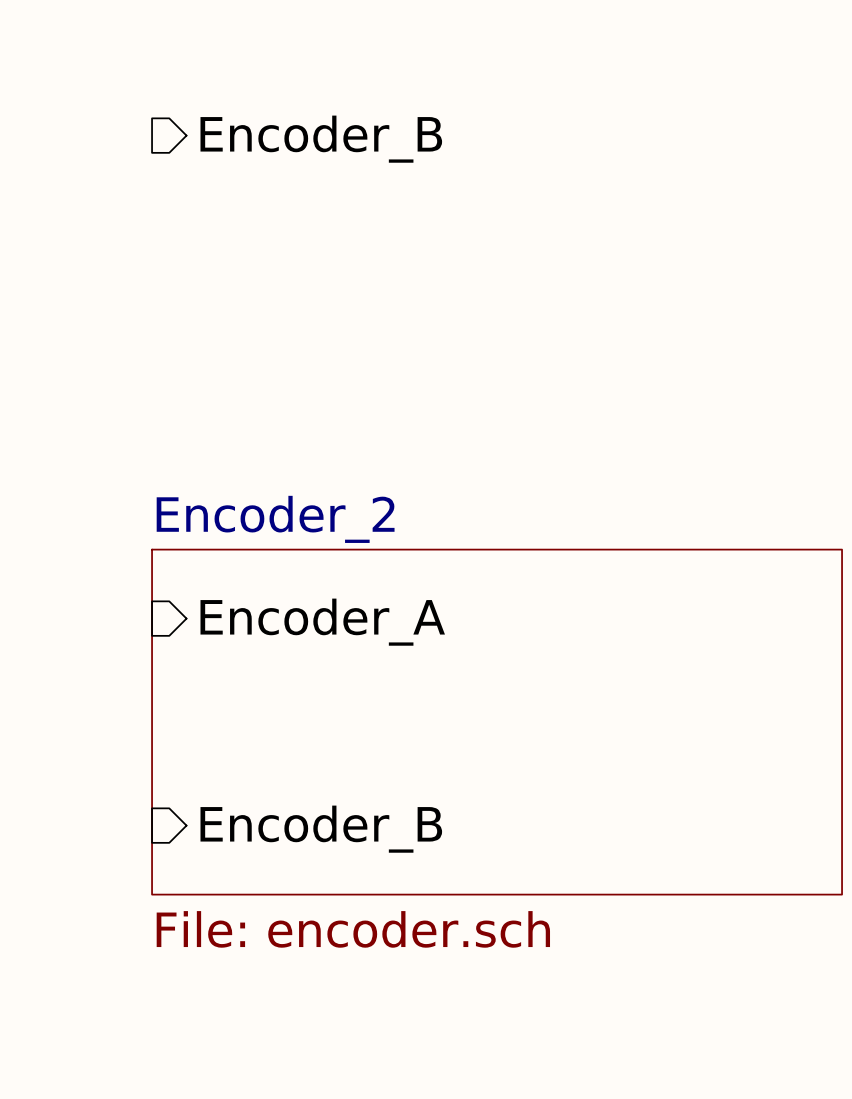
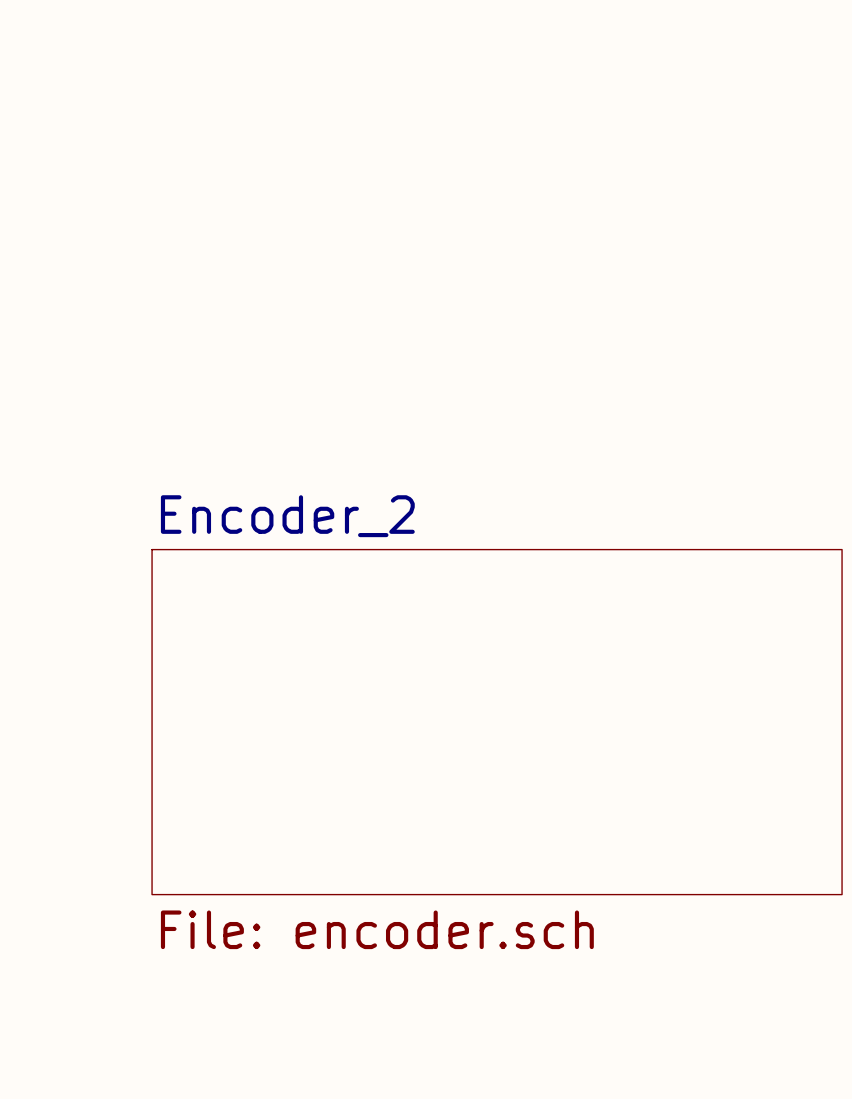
sheet pin: Encoder_B (321, 139) -> none
sheet pin: Encoder_A (322, 622) -> none
sheet pin: Encoder_B (321, 829) -> none

